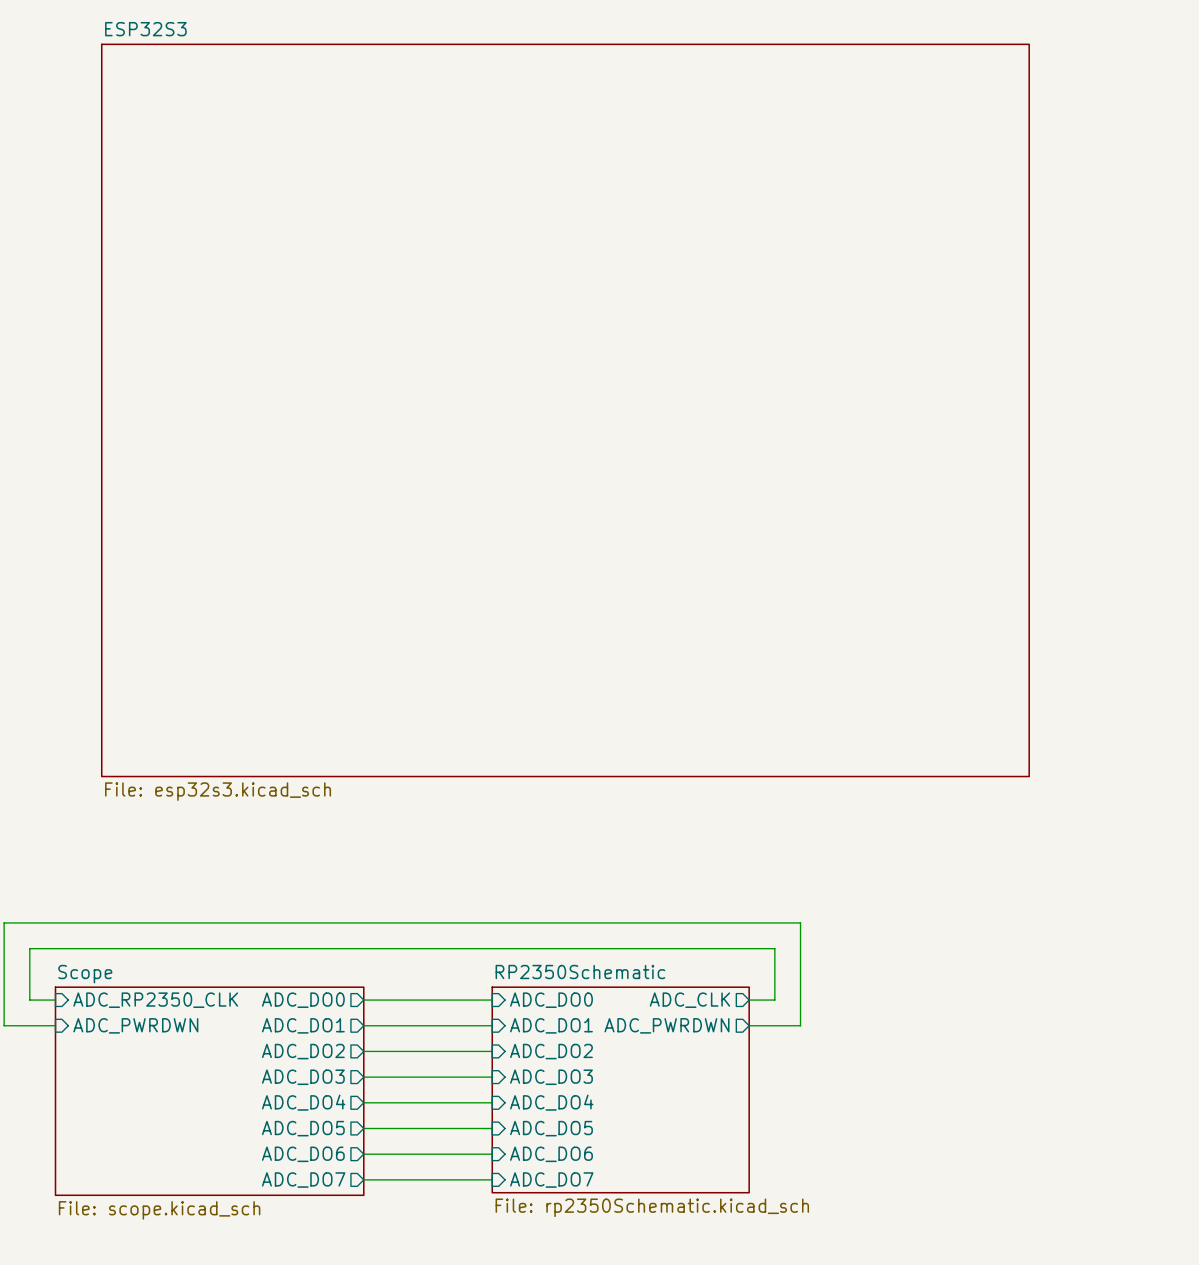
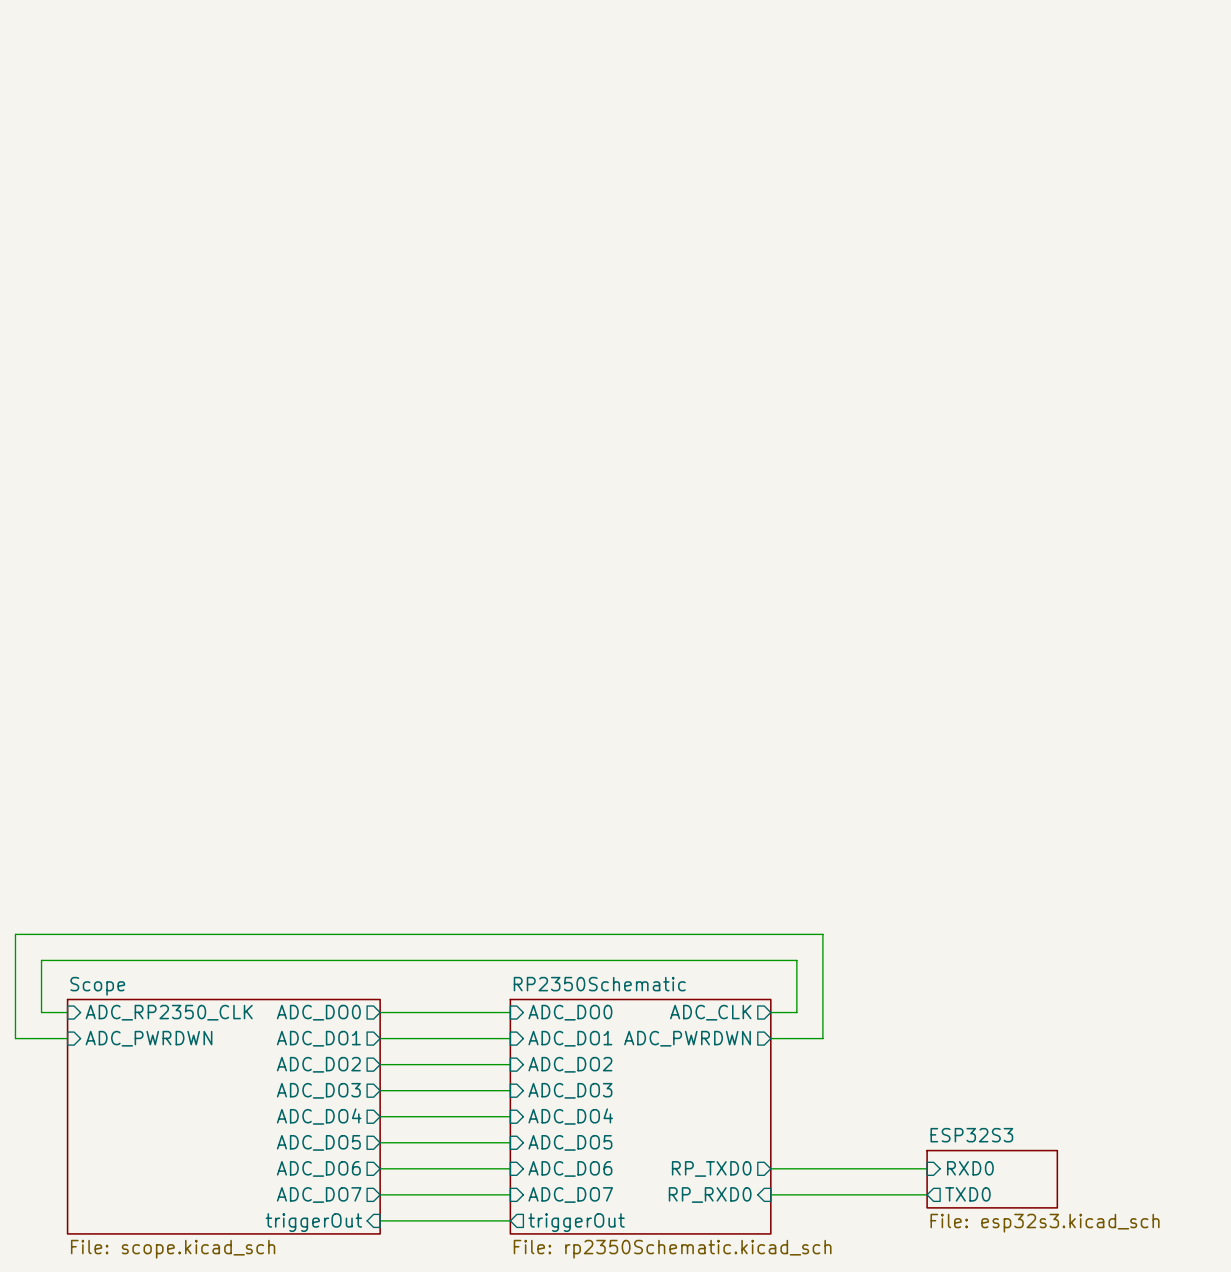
sheet ESP32S3 name position: ESP32S3 (145, 29) -> ESP32S3 (971, 1135)
sheet ESP32S3 shape: [100, 43, 1030, 778] -> [926, 1149, 1059, 1209]
sheet ESP32S3 value position: File: esp32s3.kicad_sch (218, 791) -> File: esp32s3.kicad_sch (1045, 1223)
sheet RP2350Schematic shape: [491, 986, 750, 1194] -> [509, 998, 772, 1235]
sheet Scope: File: scope.kicad_sch (209, 1091) -> none
sheet Scope: none -> File: scope.kicad_sch (223, 1116)
sheet pin: none -> RXD0 (970, 1168)
sheet pin: none -> RP_TXD0 (711, 1168)
wire: none -> (770, 1168) (927, 1168)
wire: none -> (770, 1194) (927, 1194)
sheet pin: none -> TXD0 (967, 1194)
sheet pin: none -> RP_RXD0 (710, 1194)
wire: none -> (380, 1220) (510, 1220)
sheet pin: none -> triggerOut (313, 1222)
sheet pin: none -> triggerOut (576, 1222)

